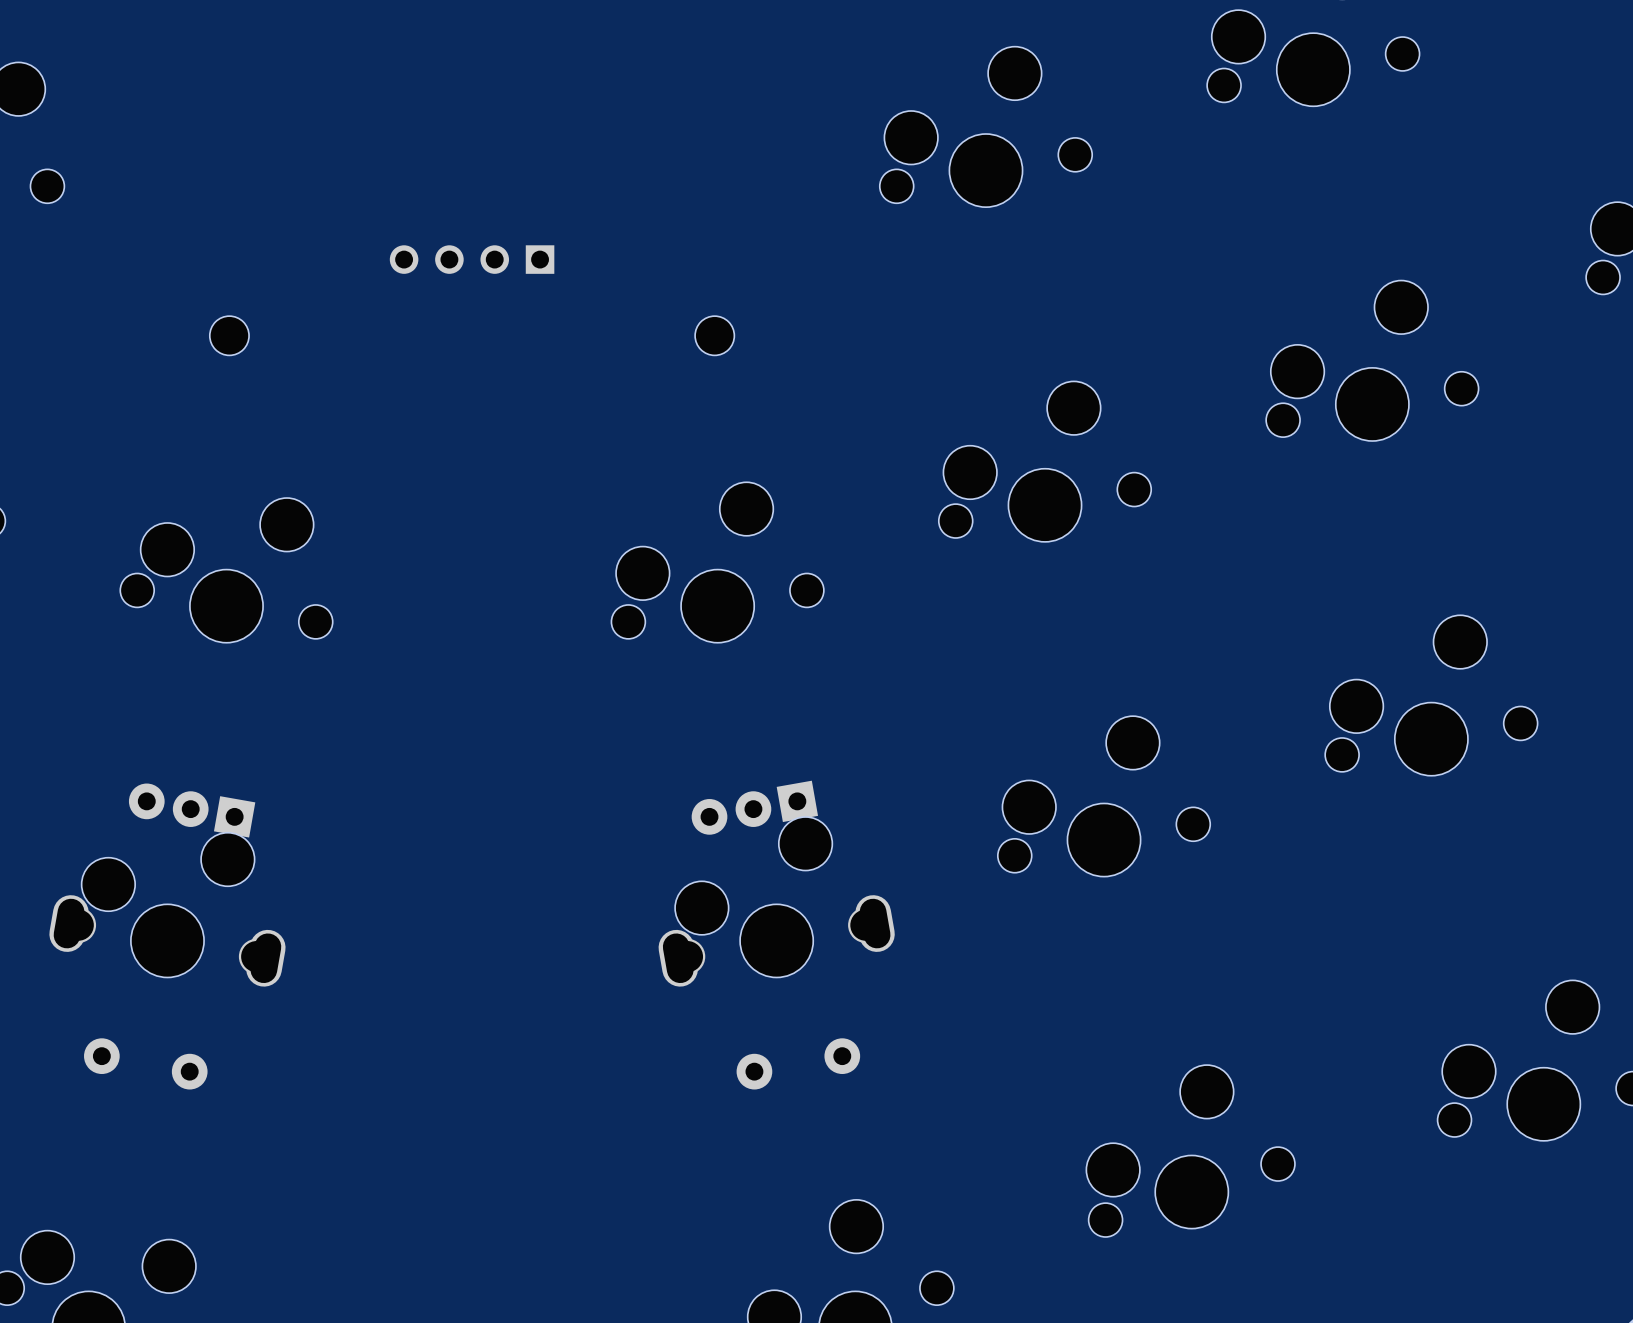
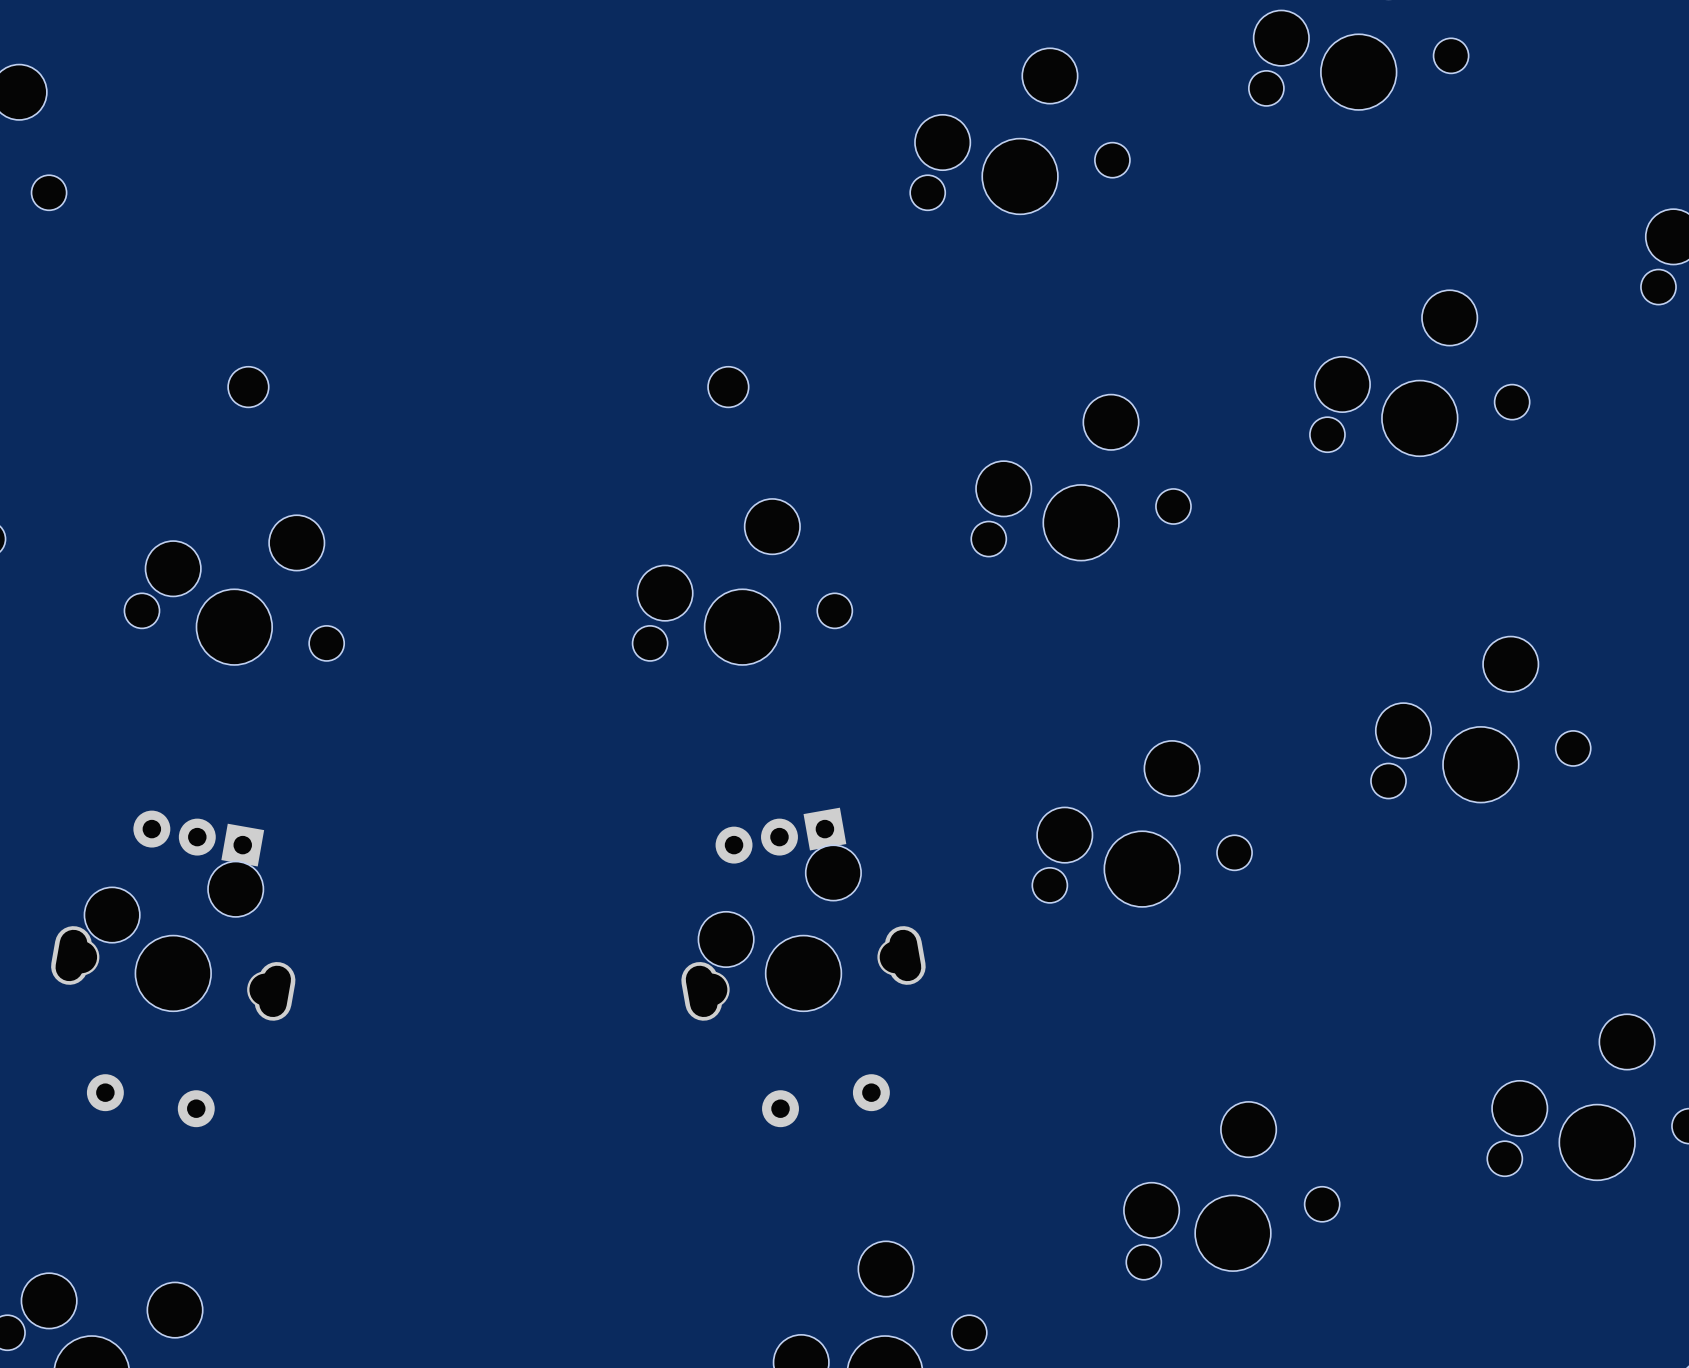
part: (472, 259) -> none
part position: (229, 335) -> (248, 387)
part position: (714, 335) -> (728, 387)

